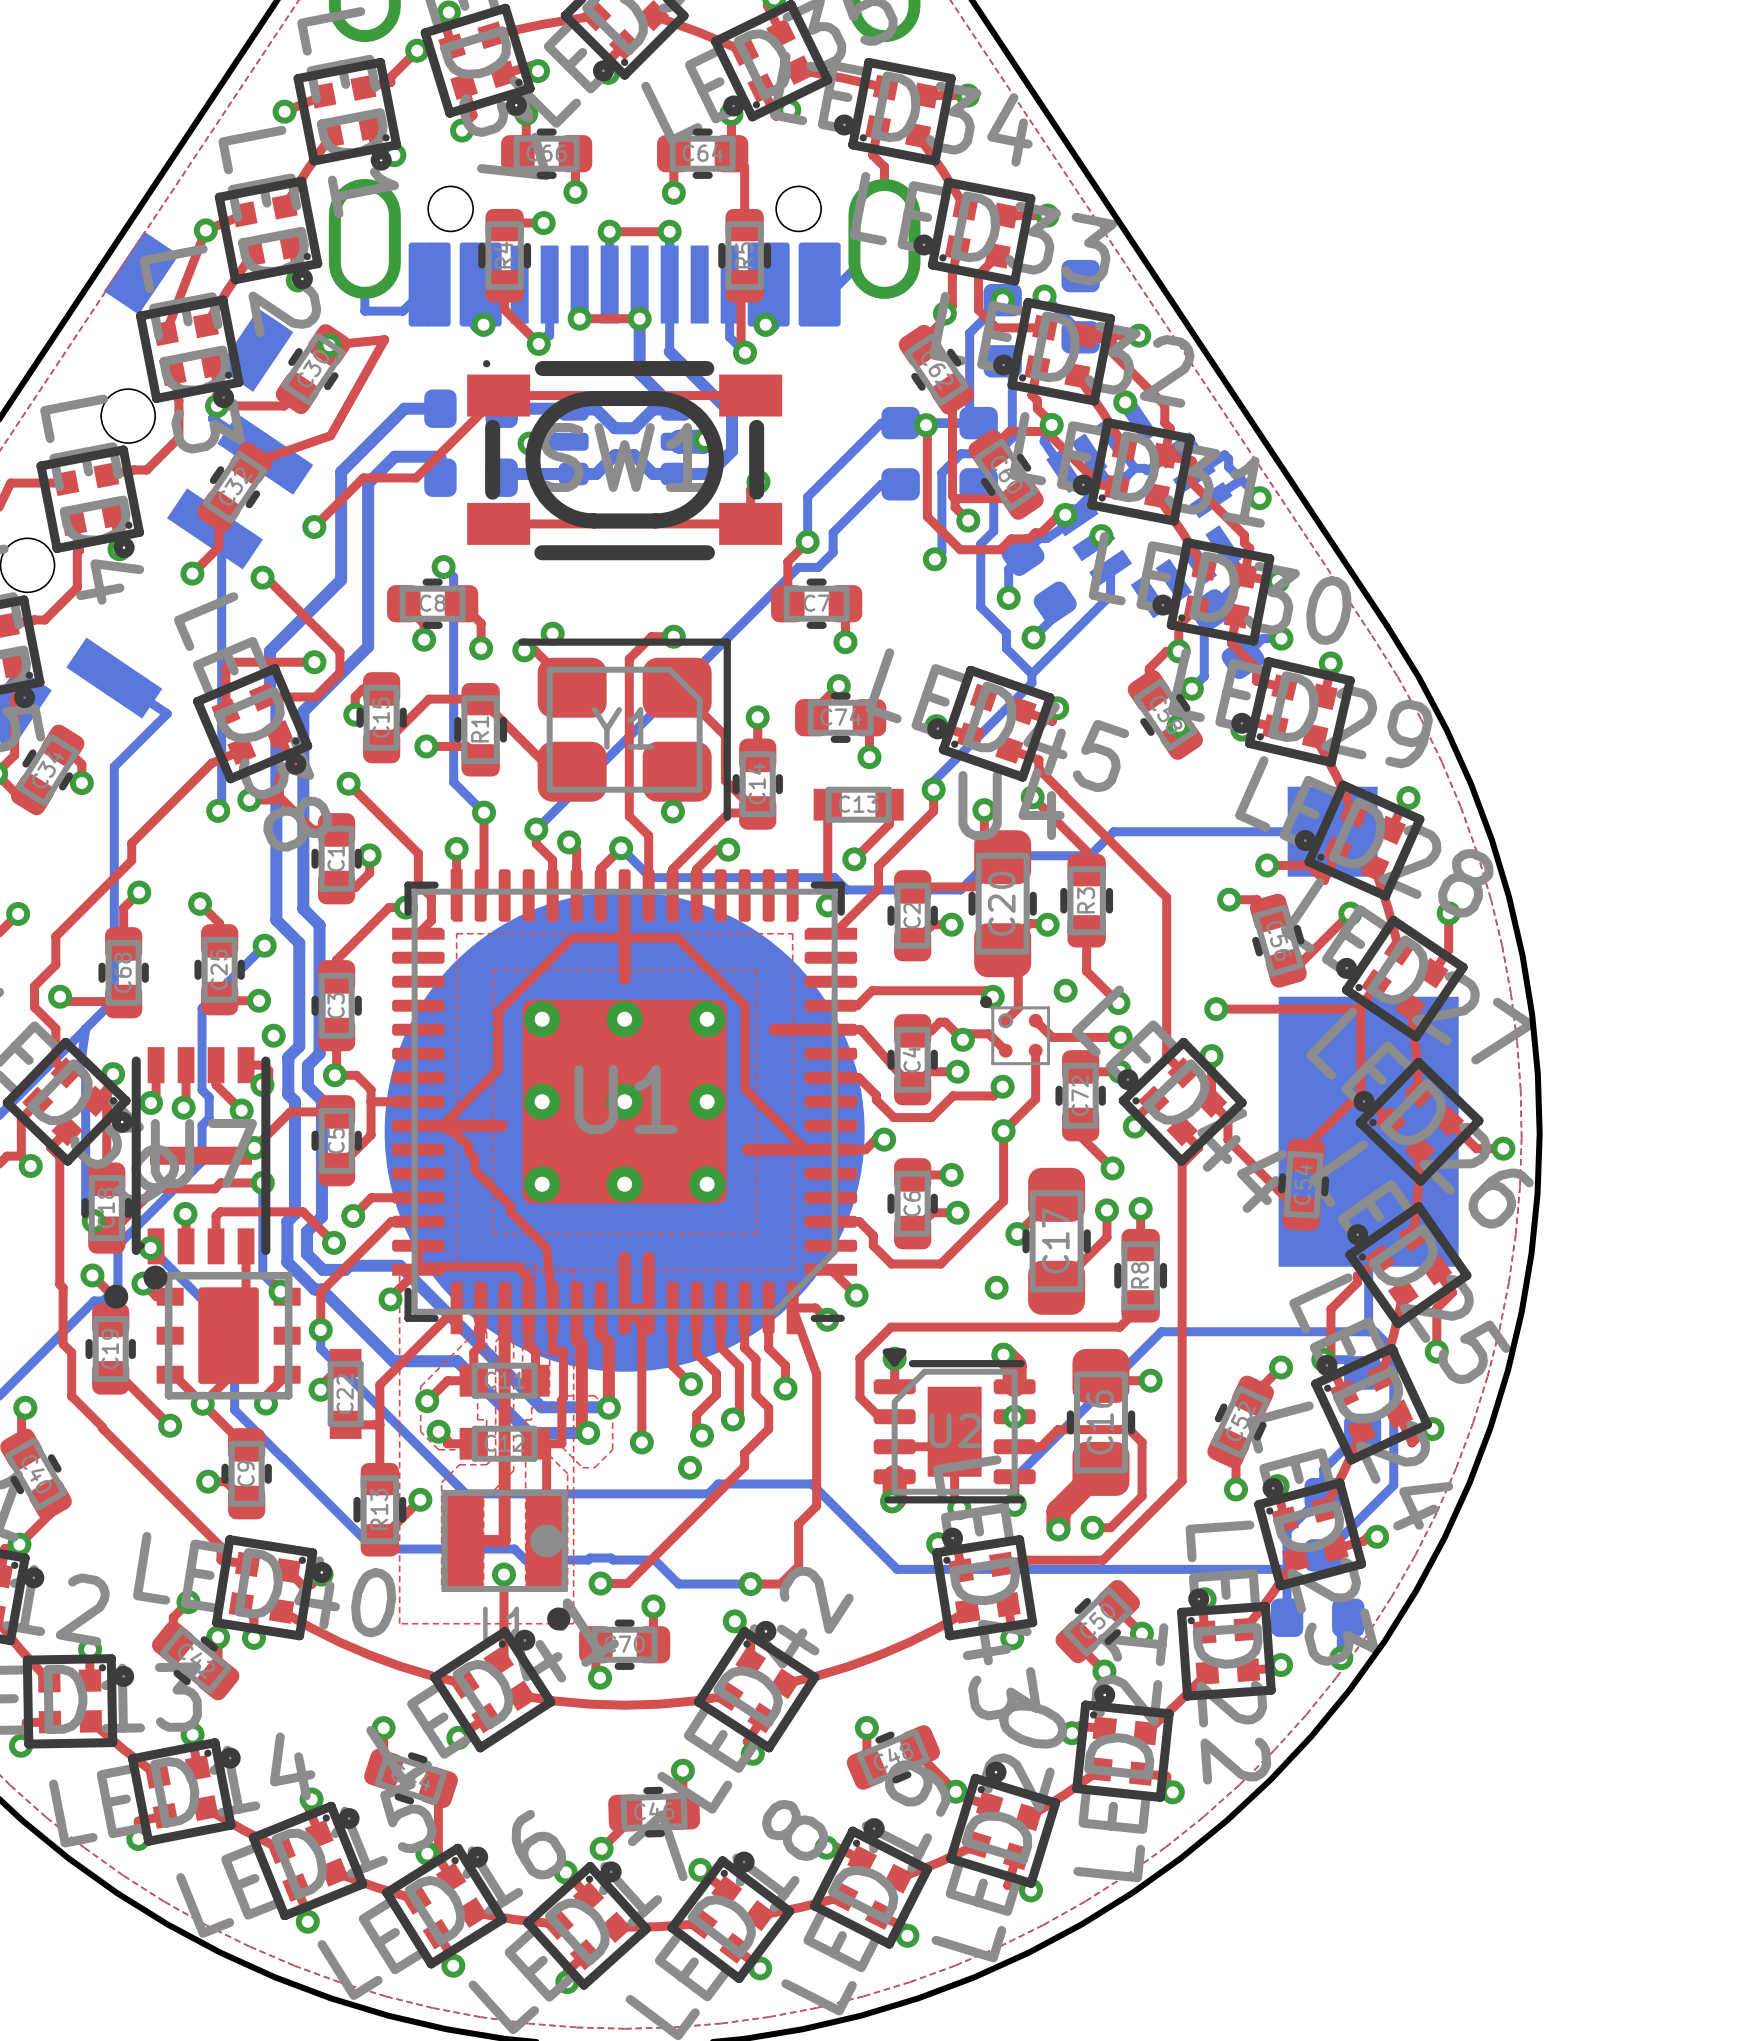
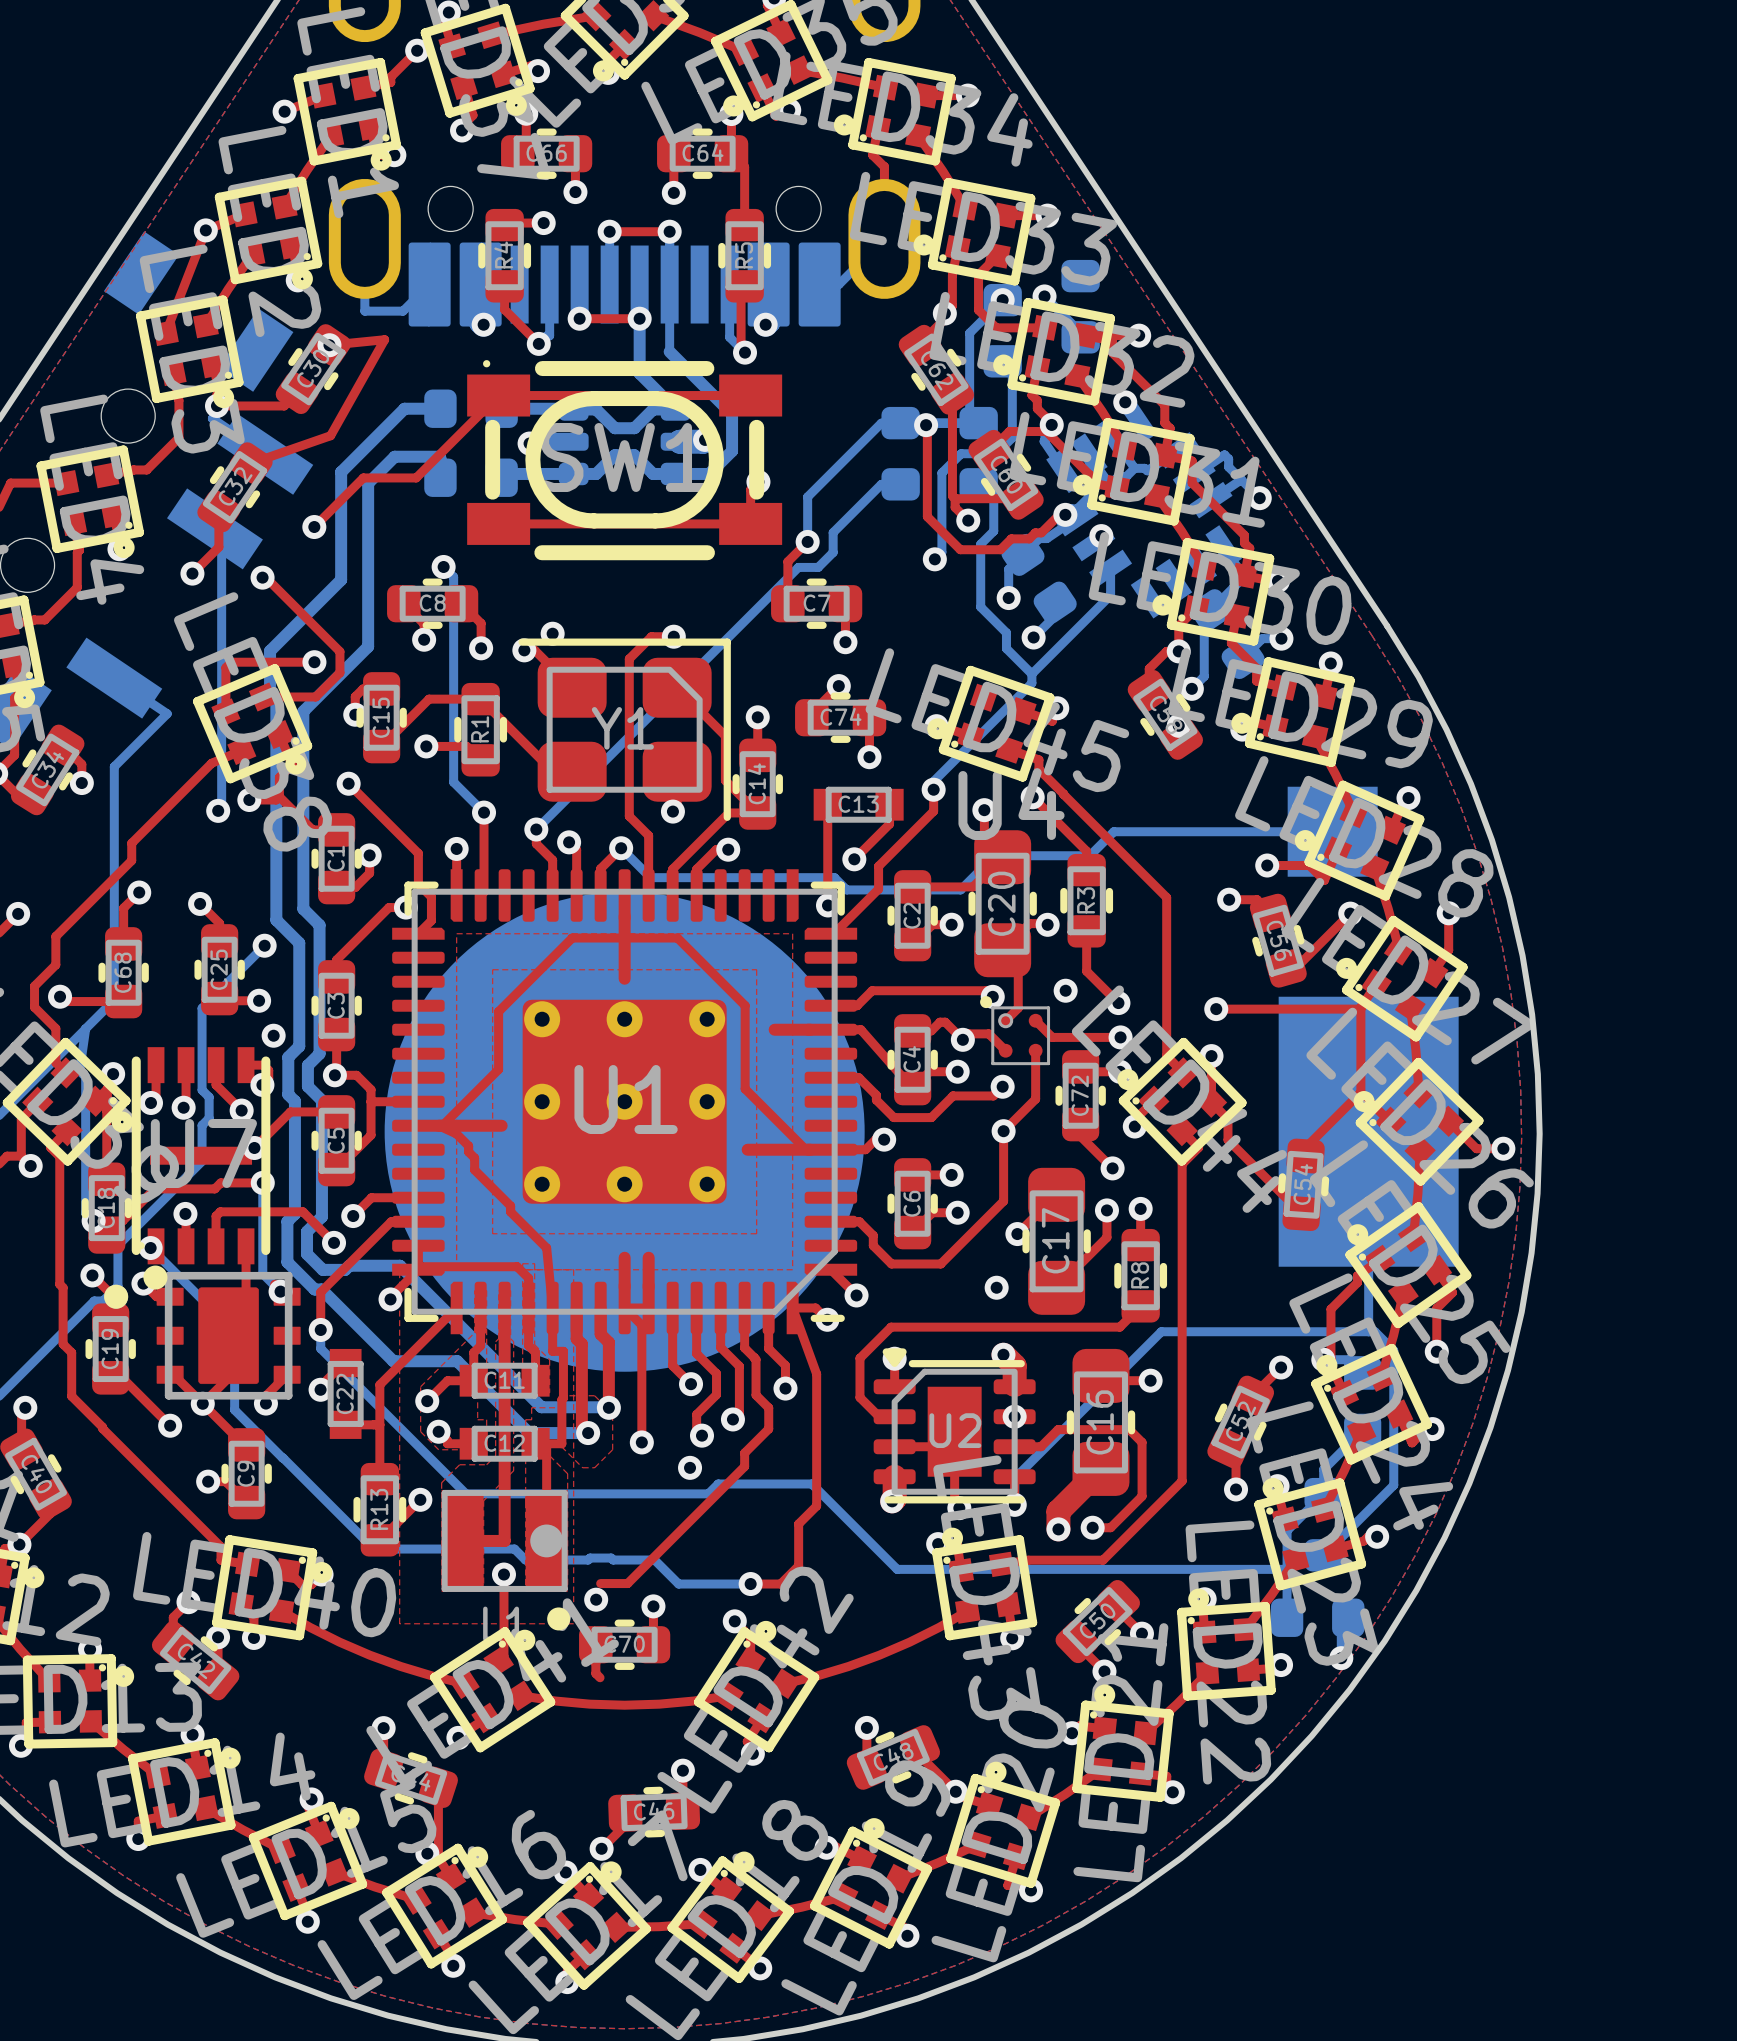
via position: (600, 1583) -> (596, 1599)
via: (600, 1677) -> none

